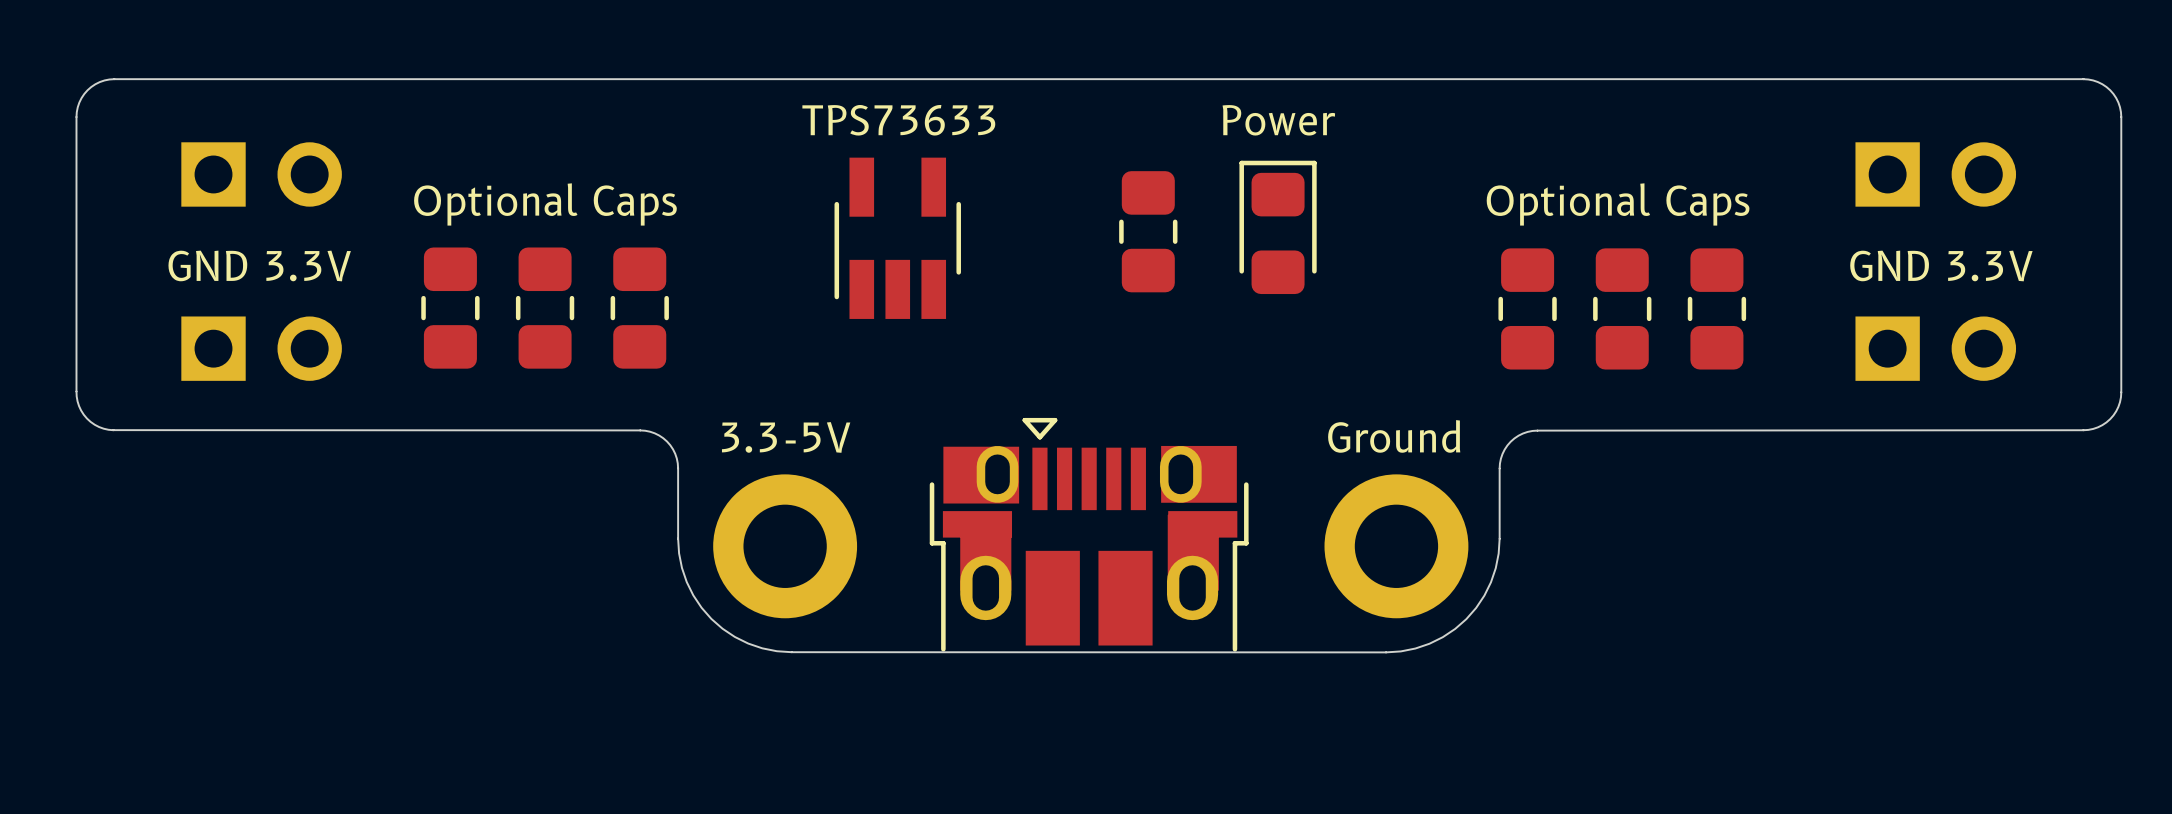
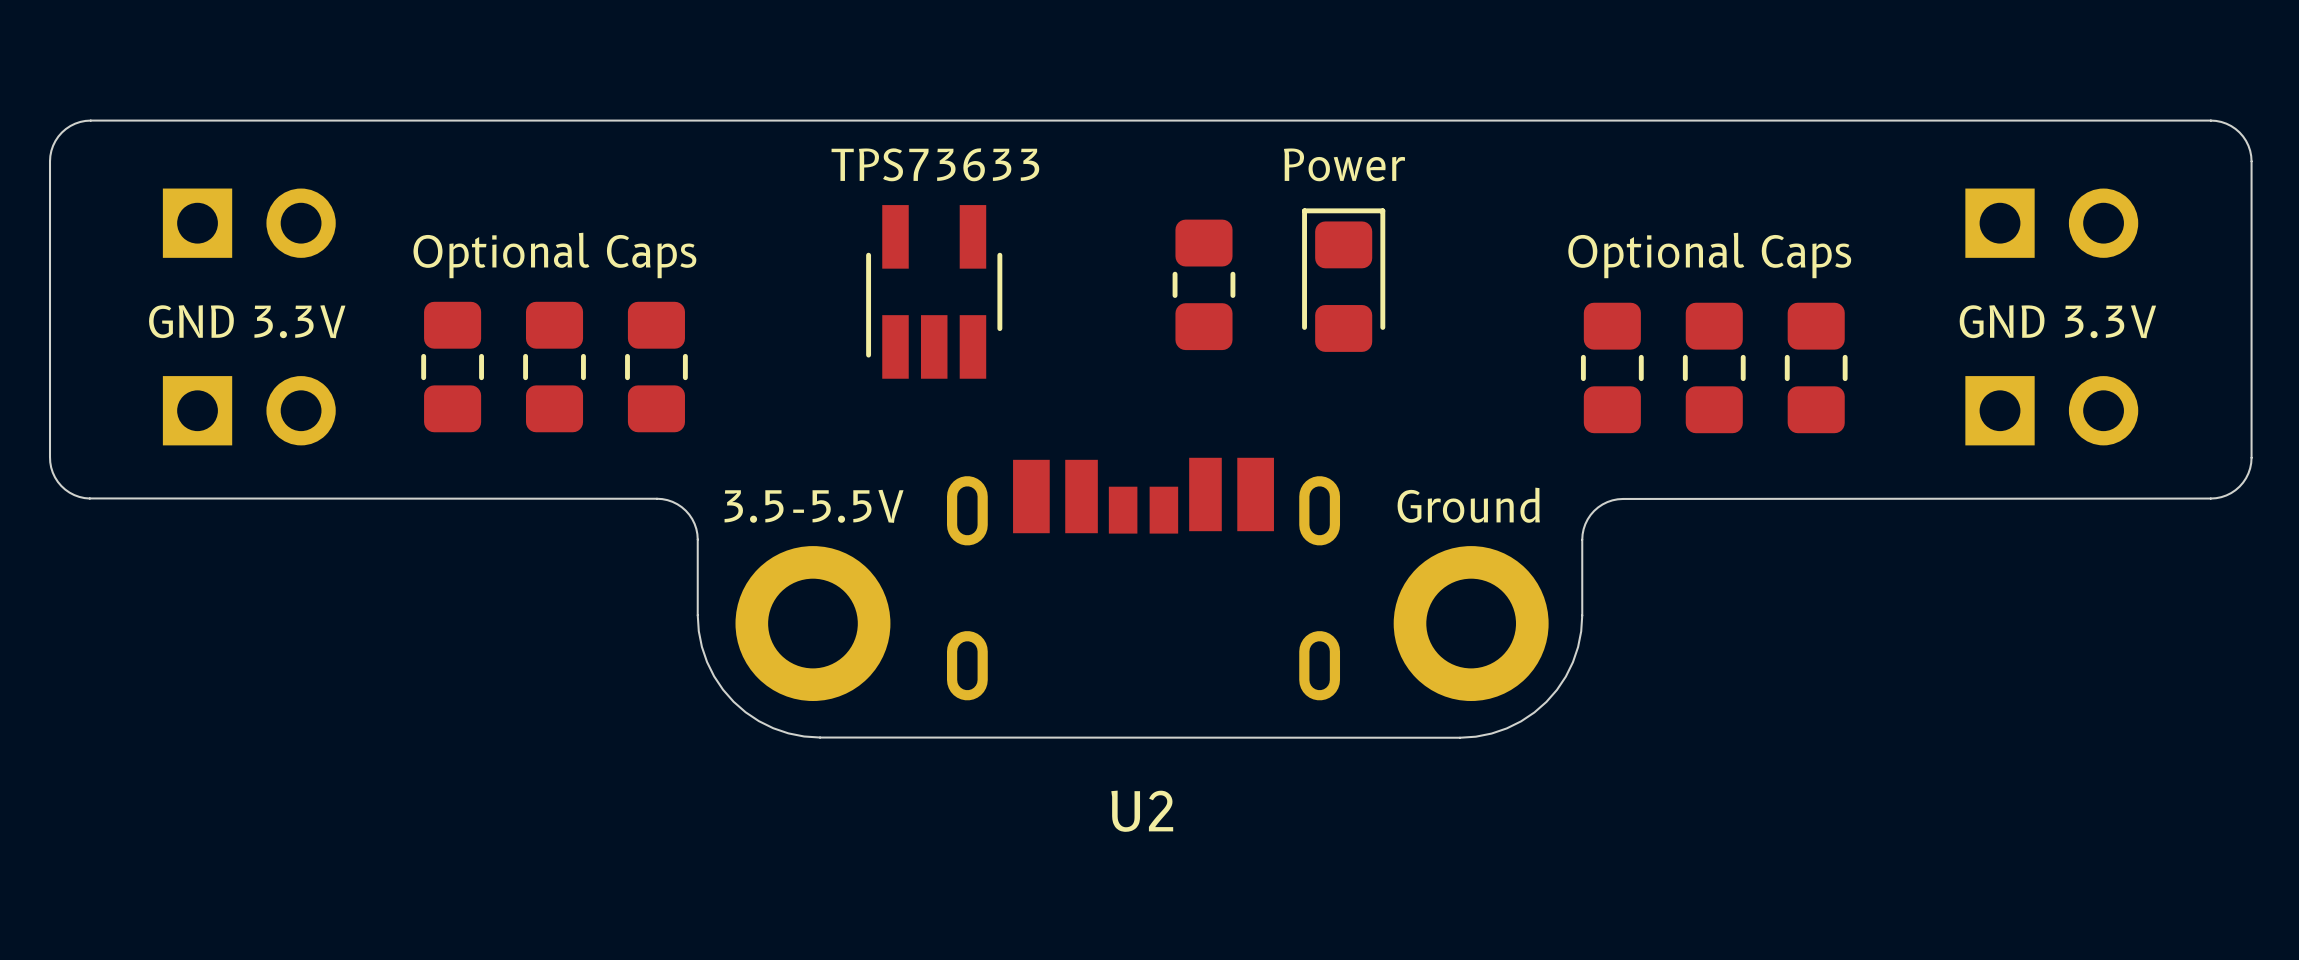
text: 3.3-5V (786, 437) -> 3.5-5.5V (814, 506)
U2: none -> (1143, 579)
part: (1089, 534) -> none

